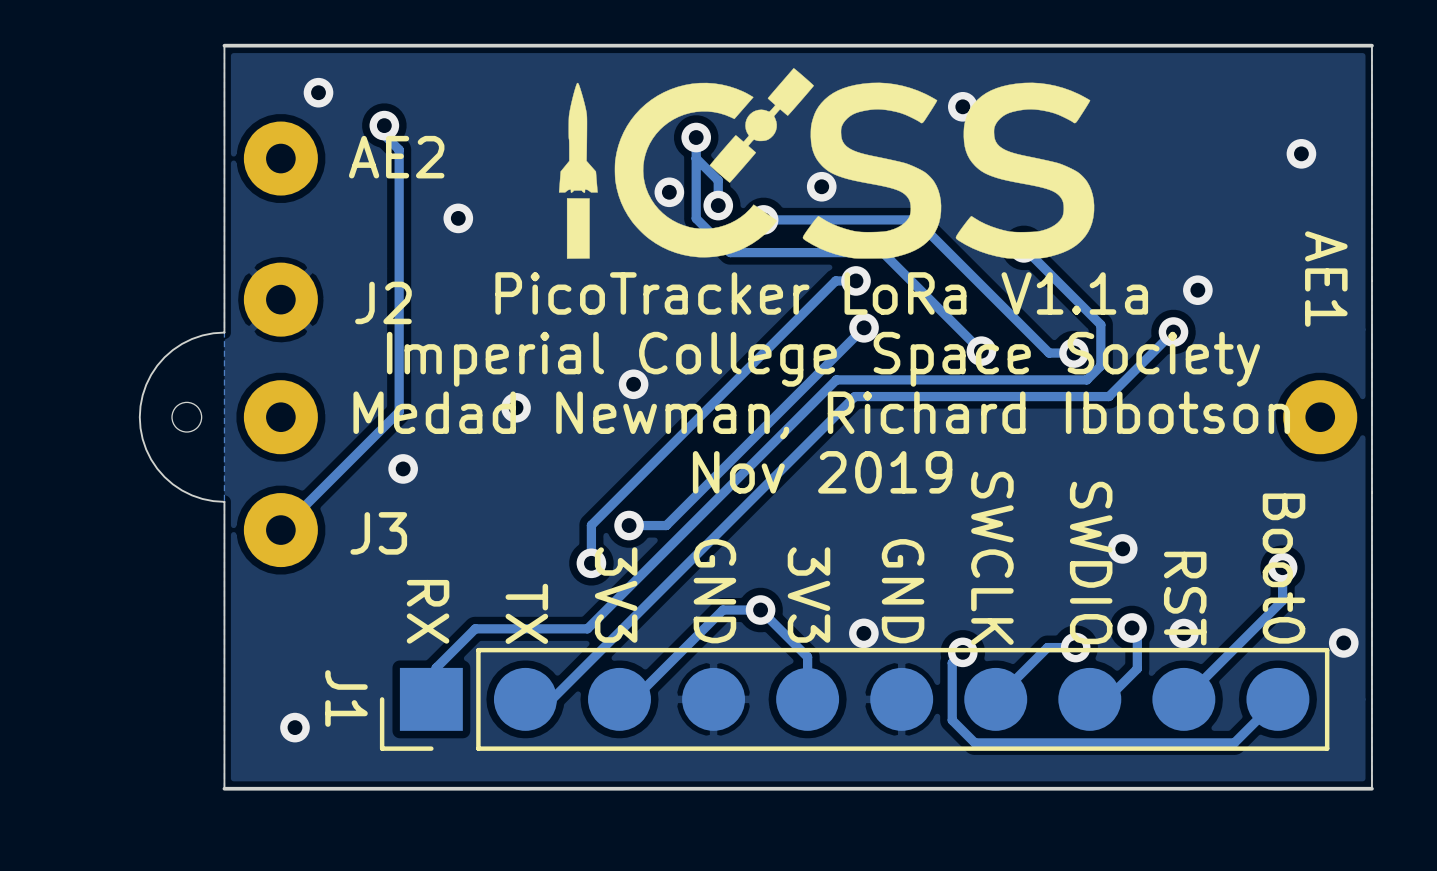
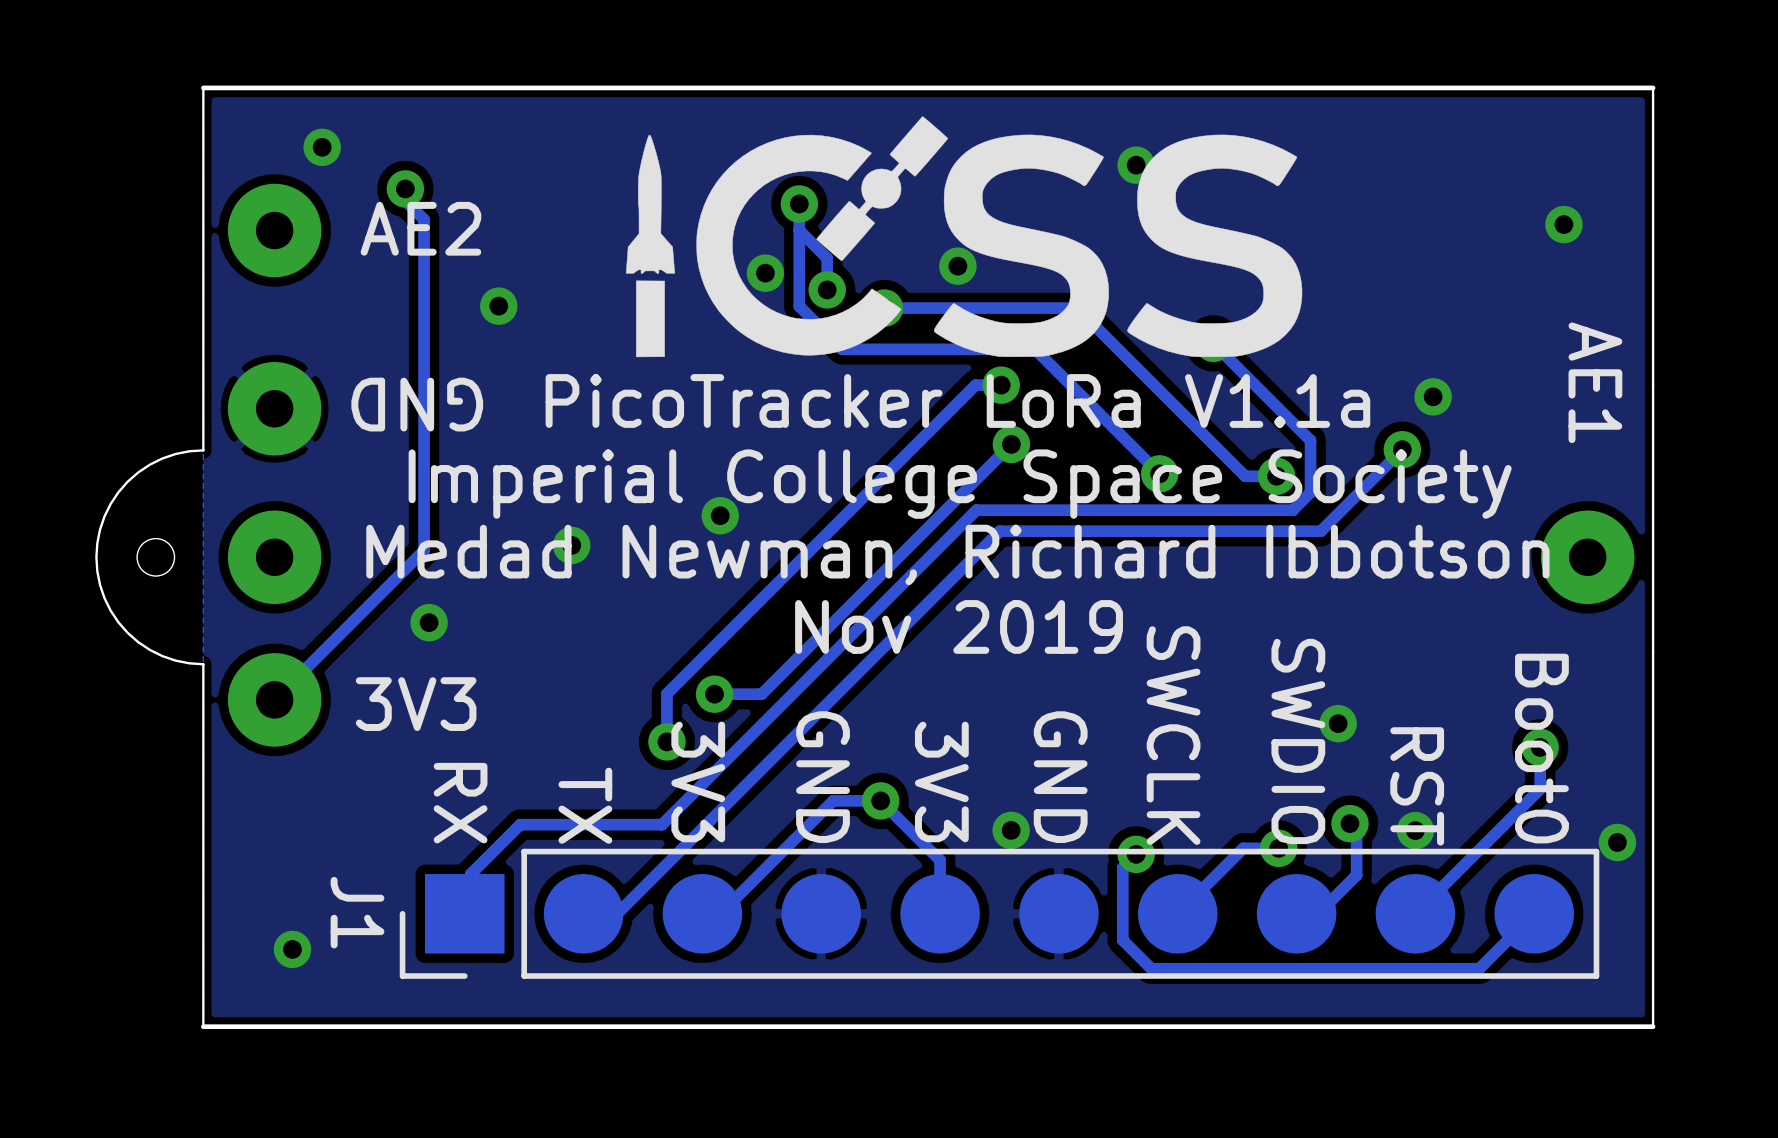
text: none -> GND (417, 404)
J2 name: J2 (383, 302) -> none
J3 name: J3 (378, 533) -> none
text: none -> 3V3 (416, 704)

